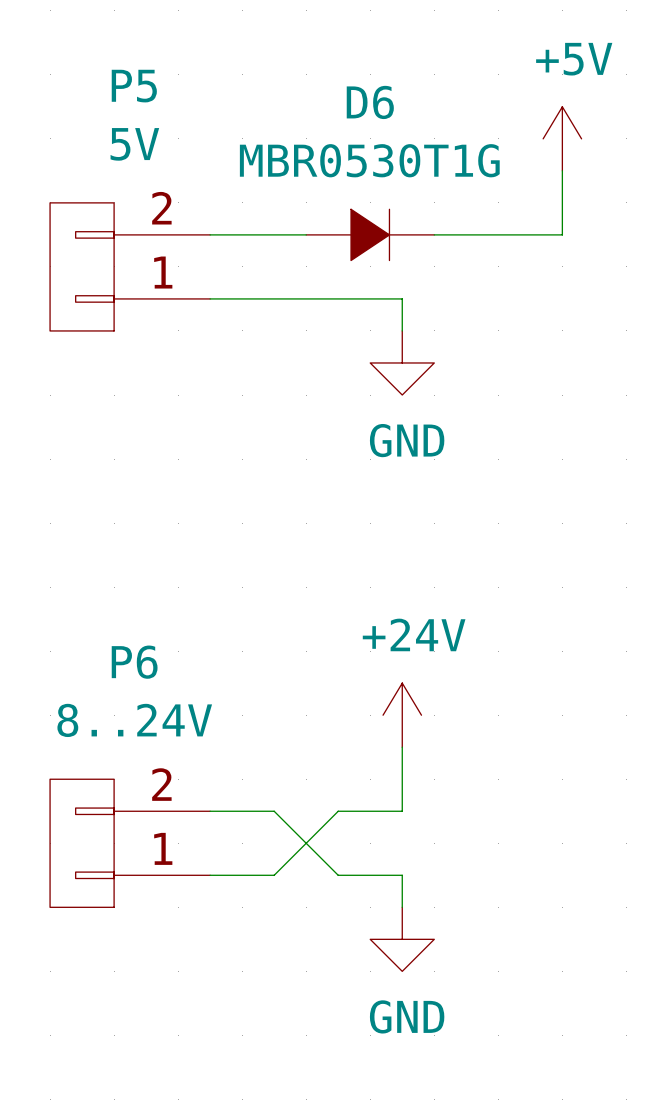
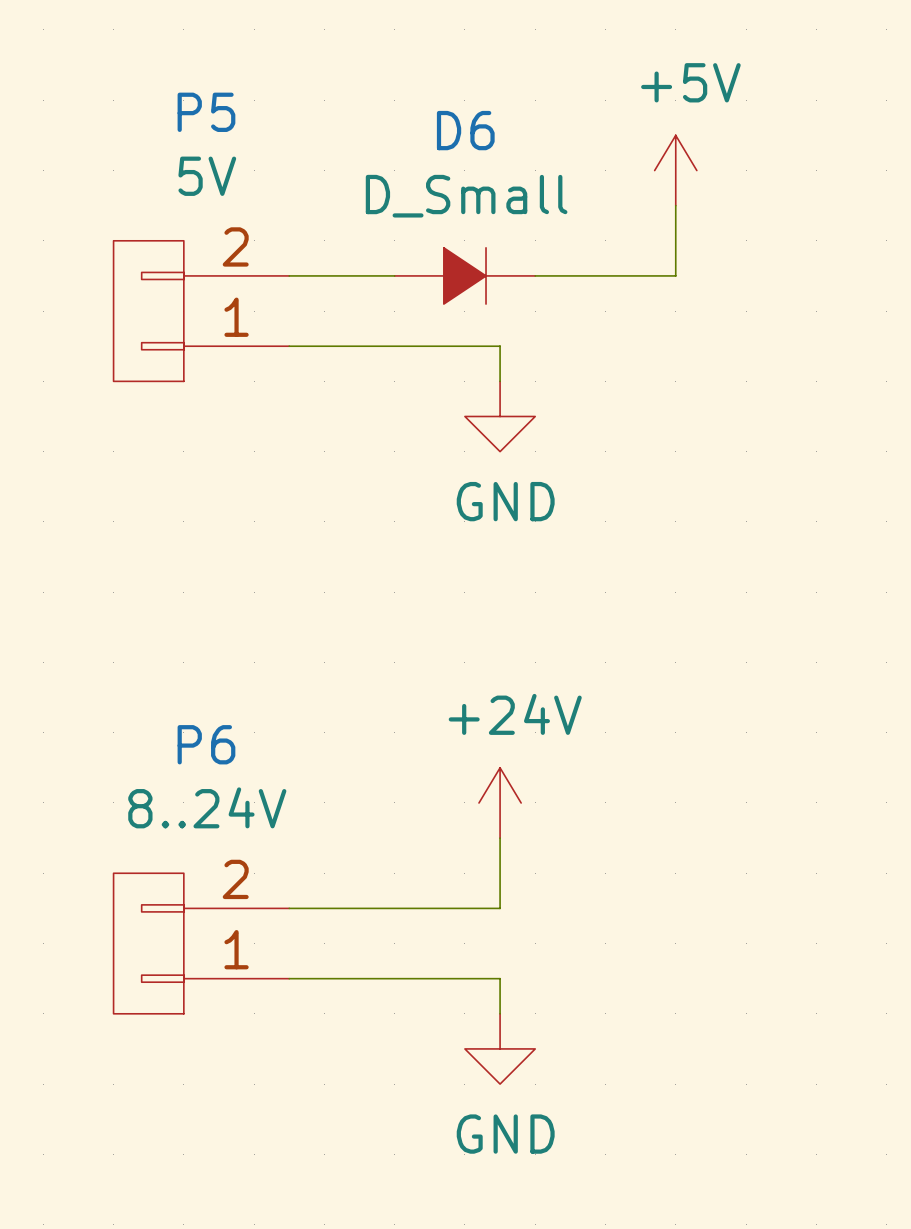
D6 value: MBR0530T1G (369, 160) -> D_Small (466, 196)
wire: (274, 811) (338, 875) -> (359, 908) (429, 908)
wire: (338, 811) (274, 875) -> (429, 978) (359, 978)

